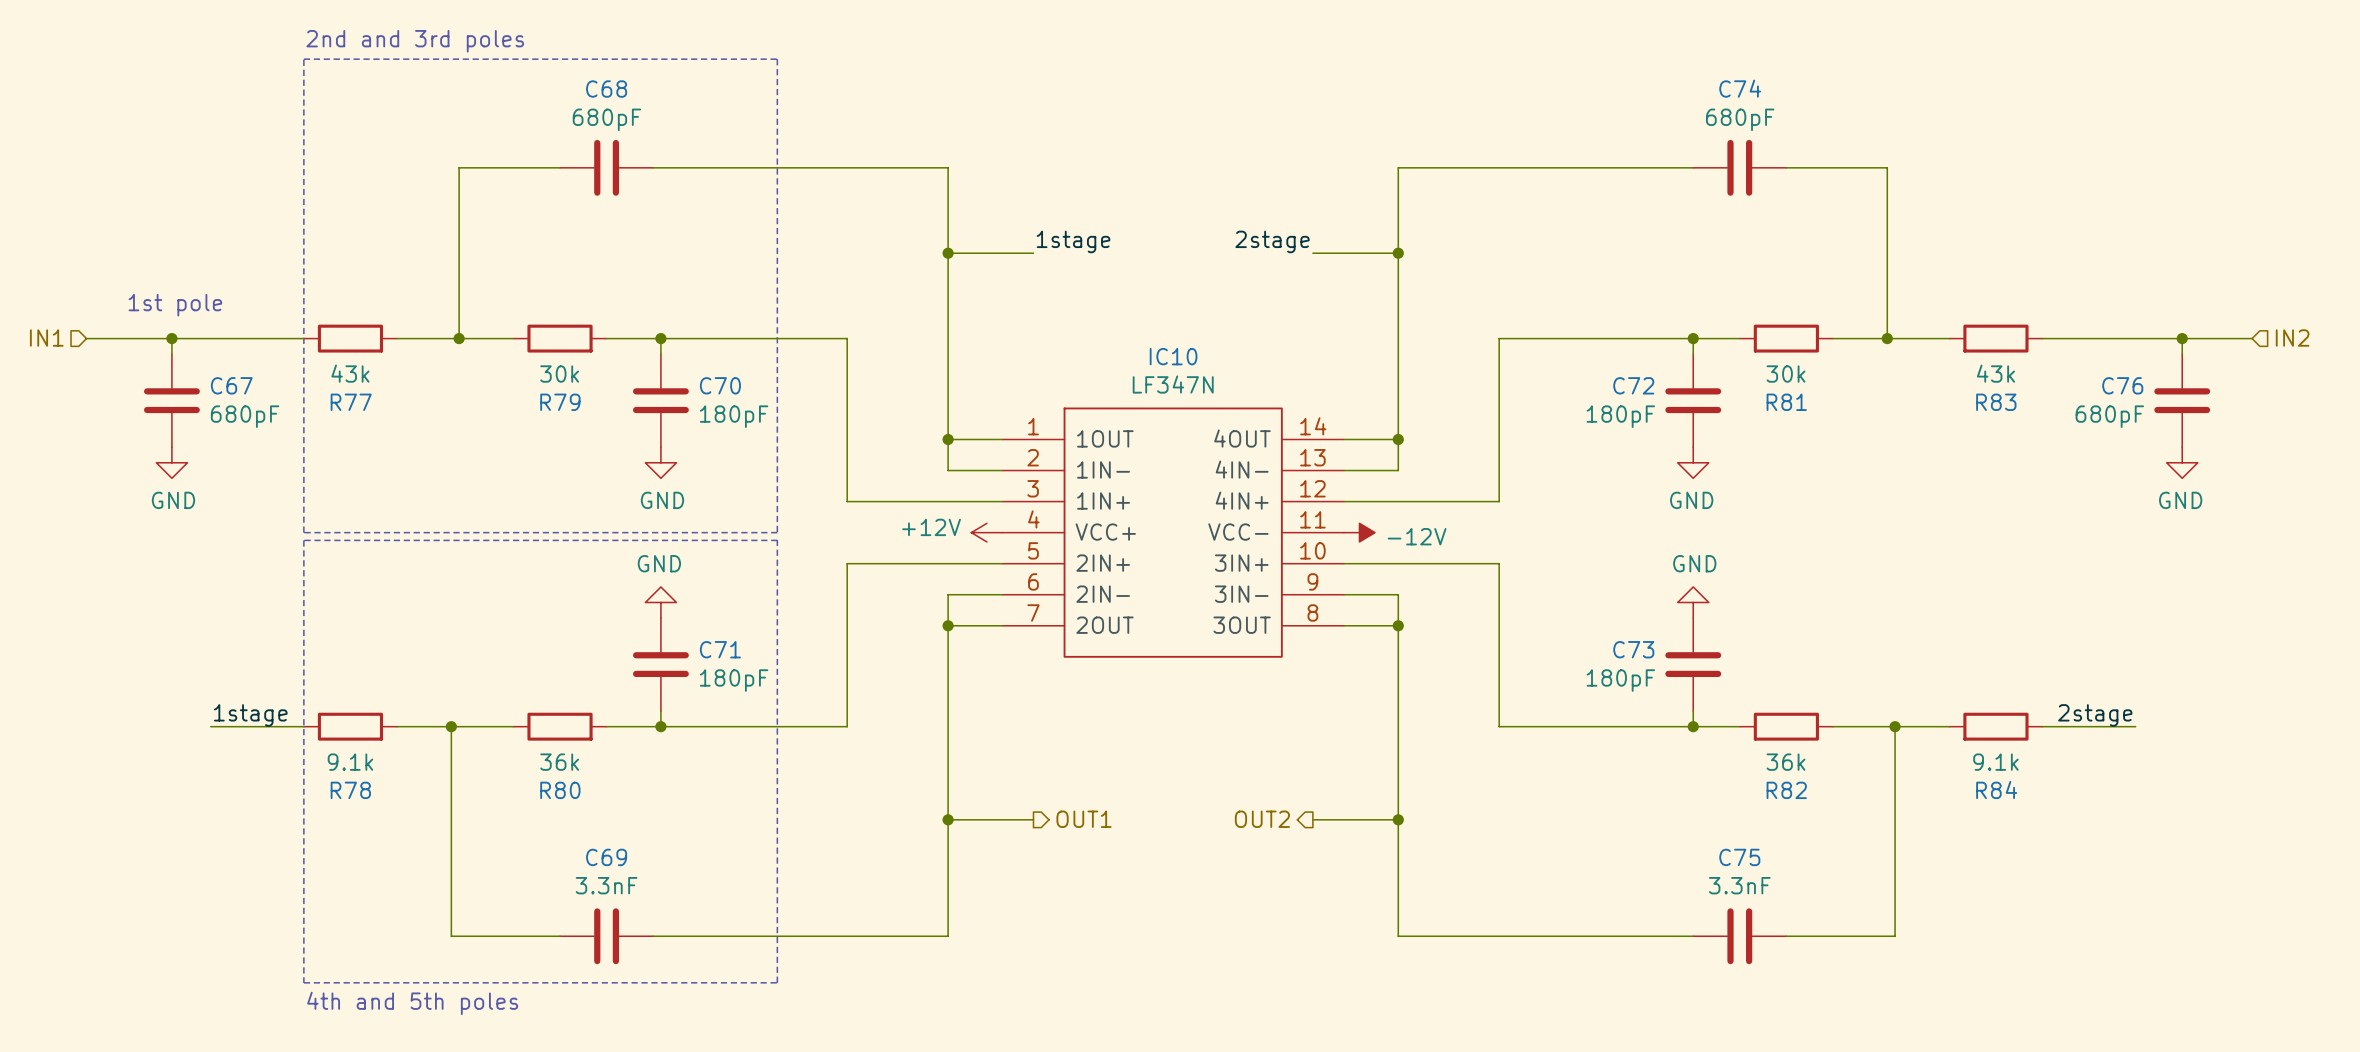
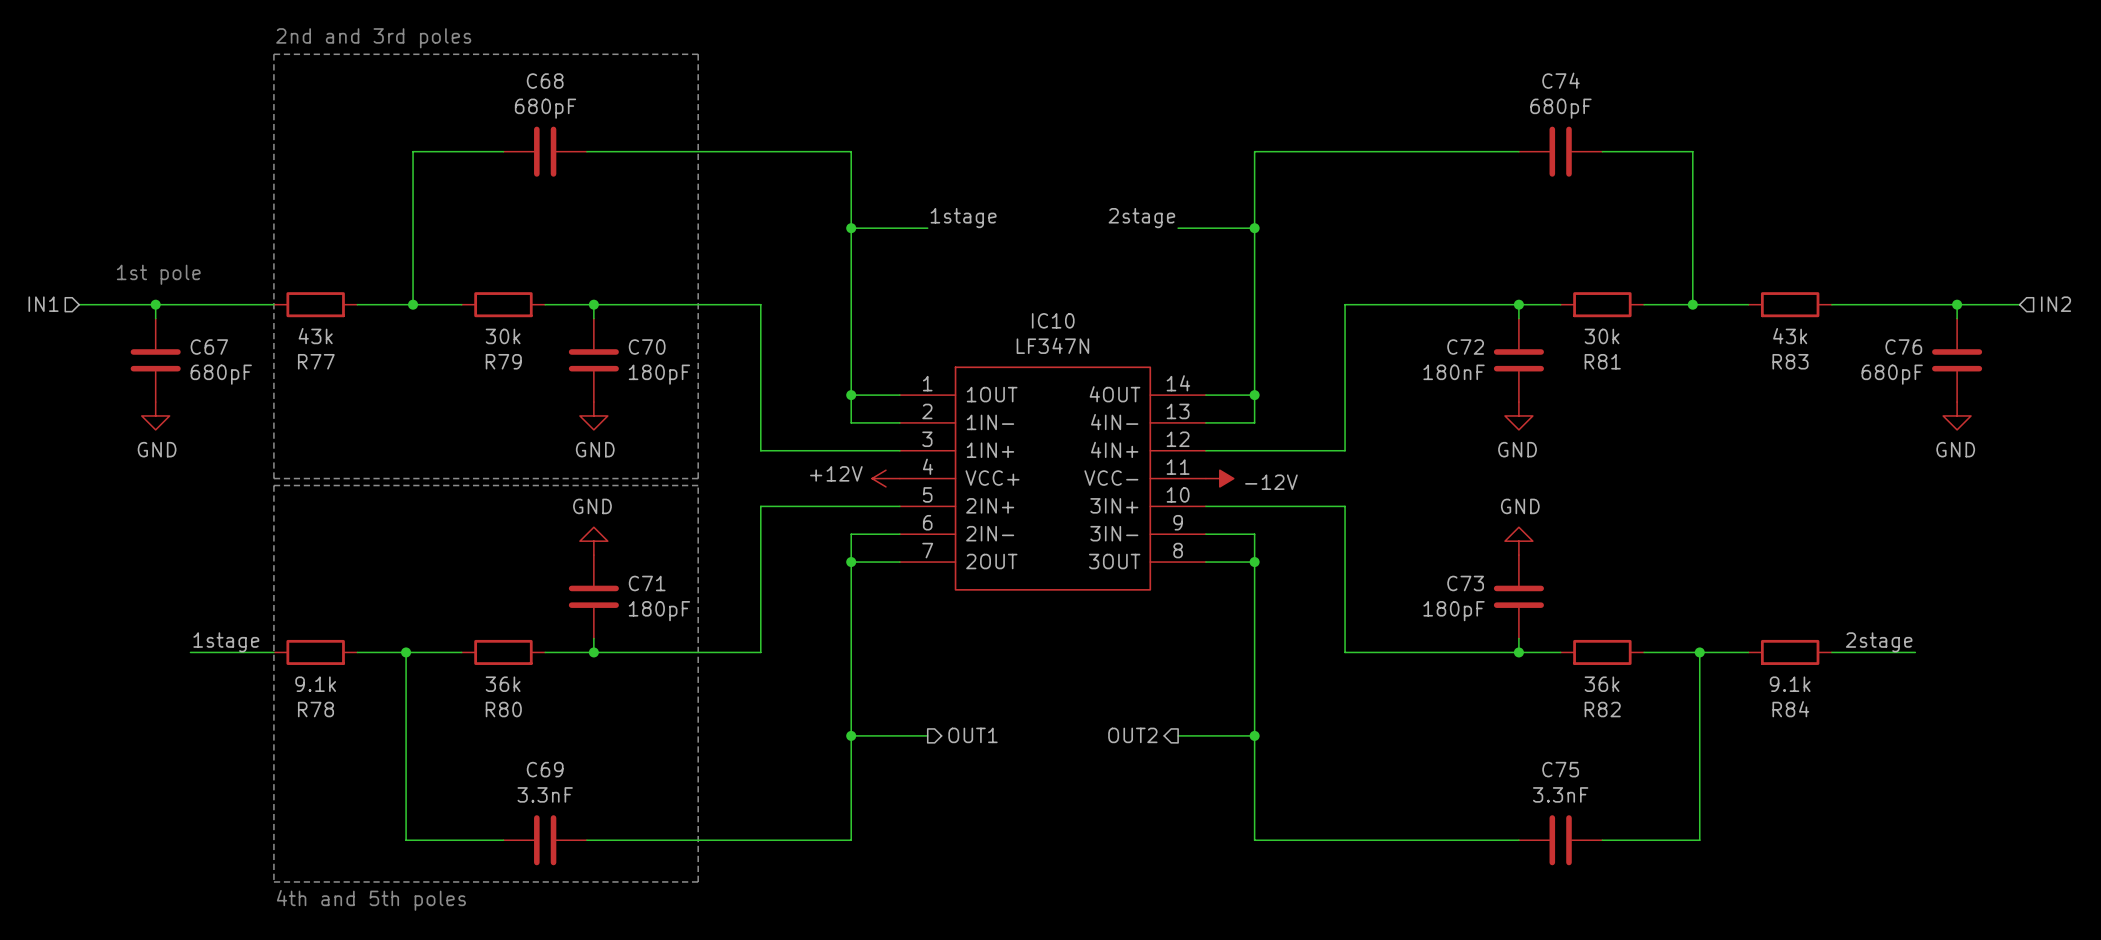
C72 value: 180pF (1620, 416) -> 180nF (1454, 372)

